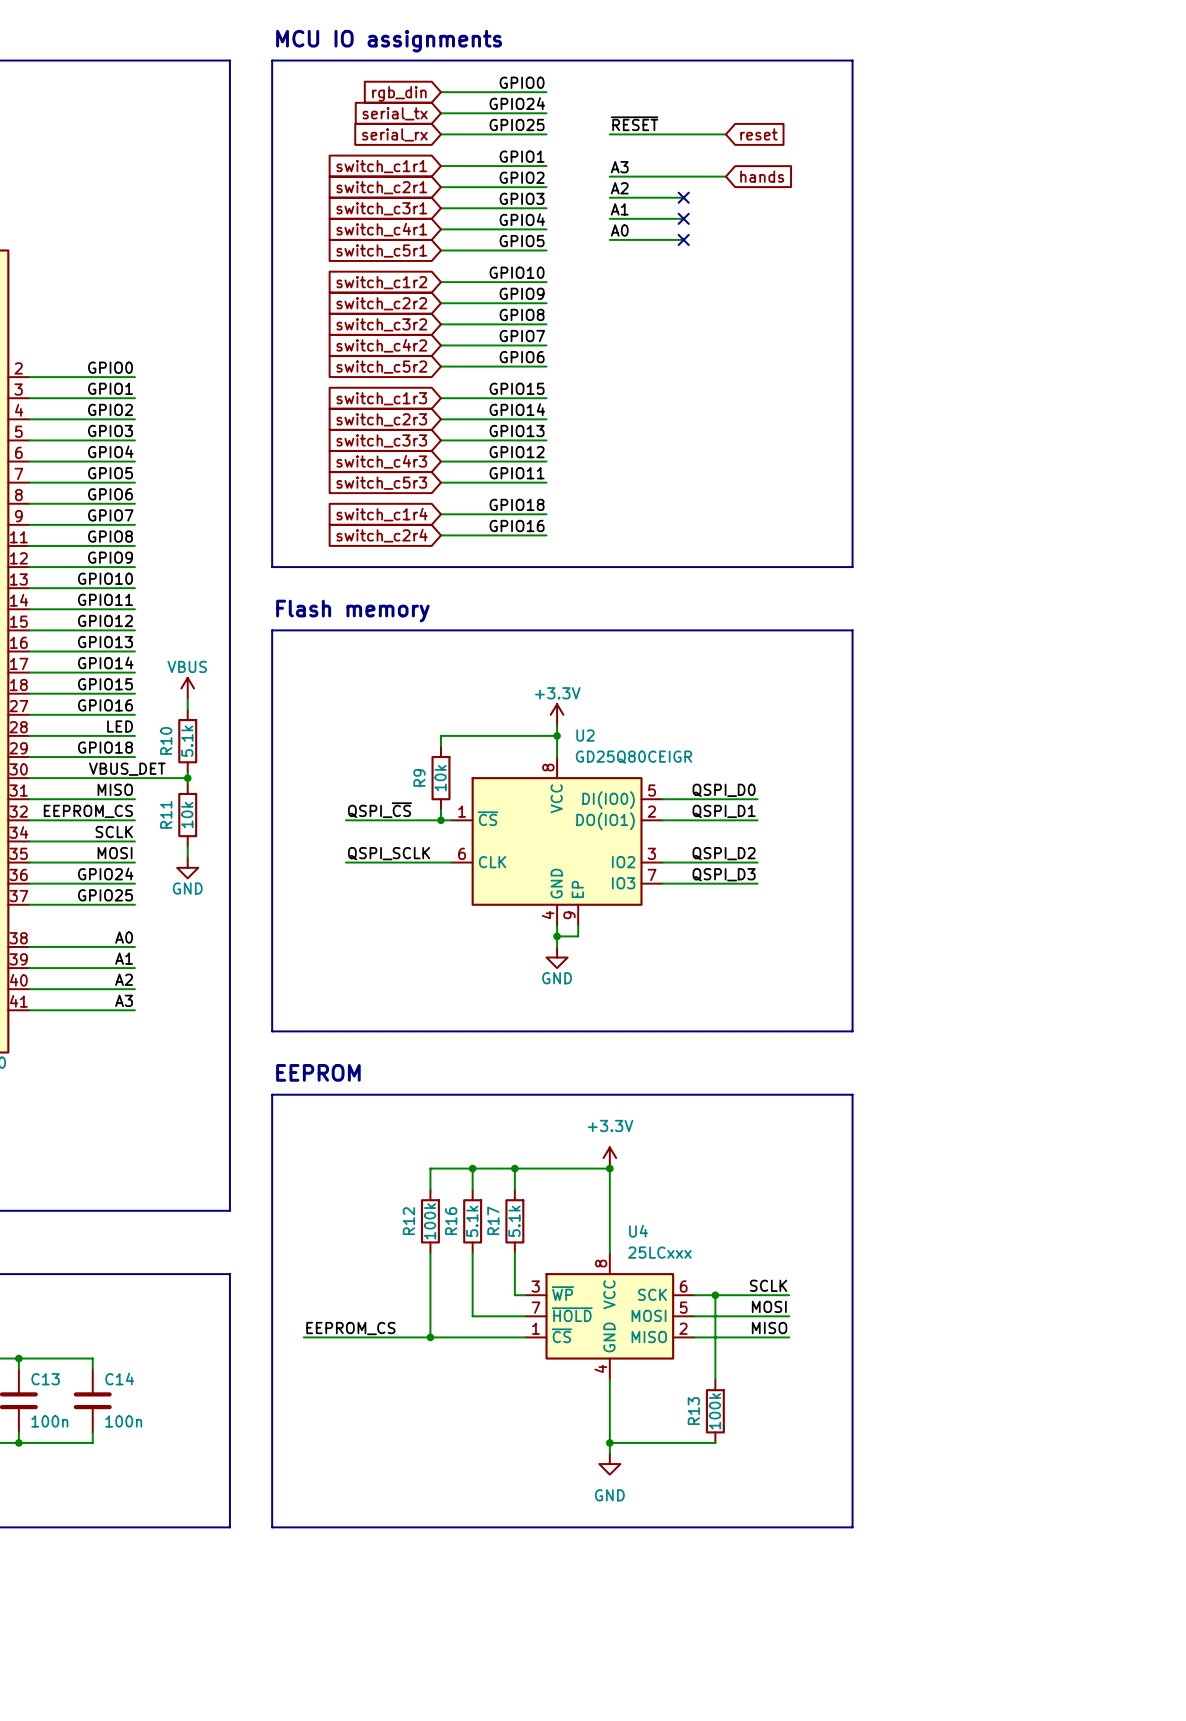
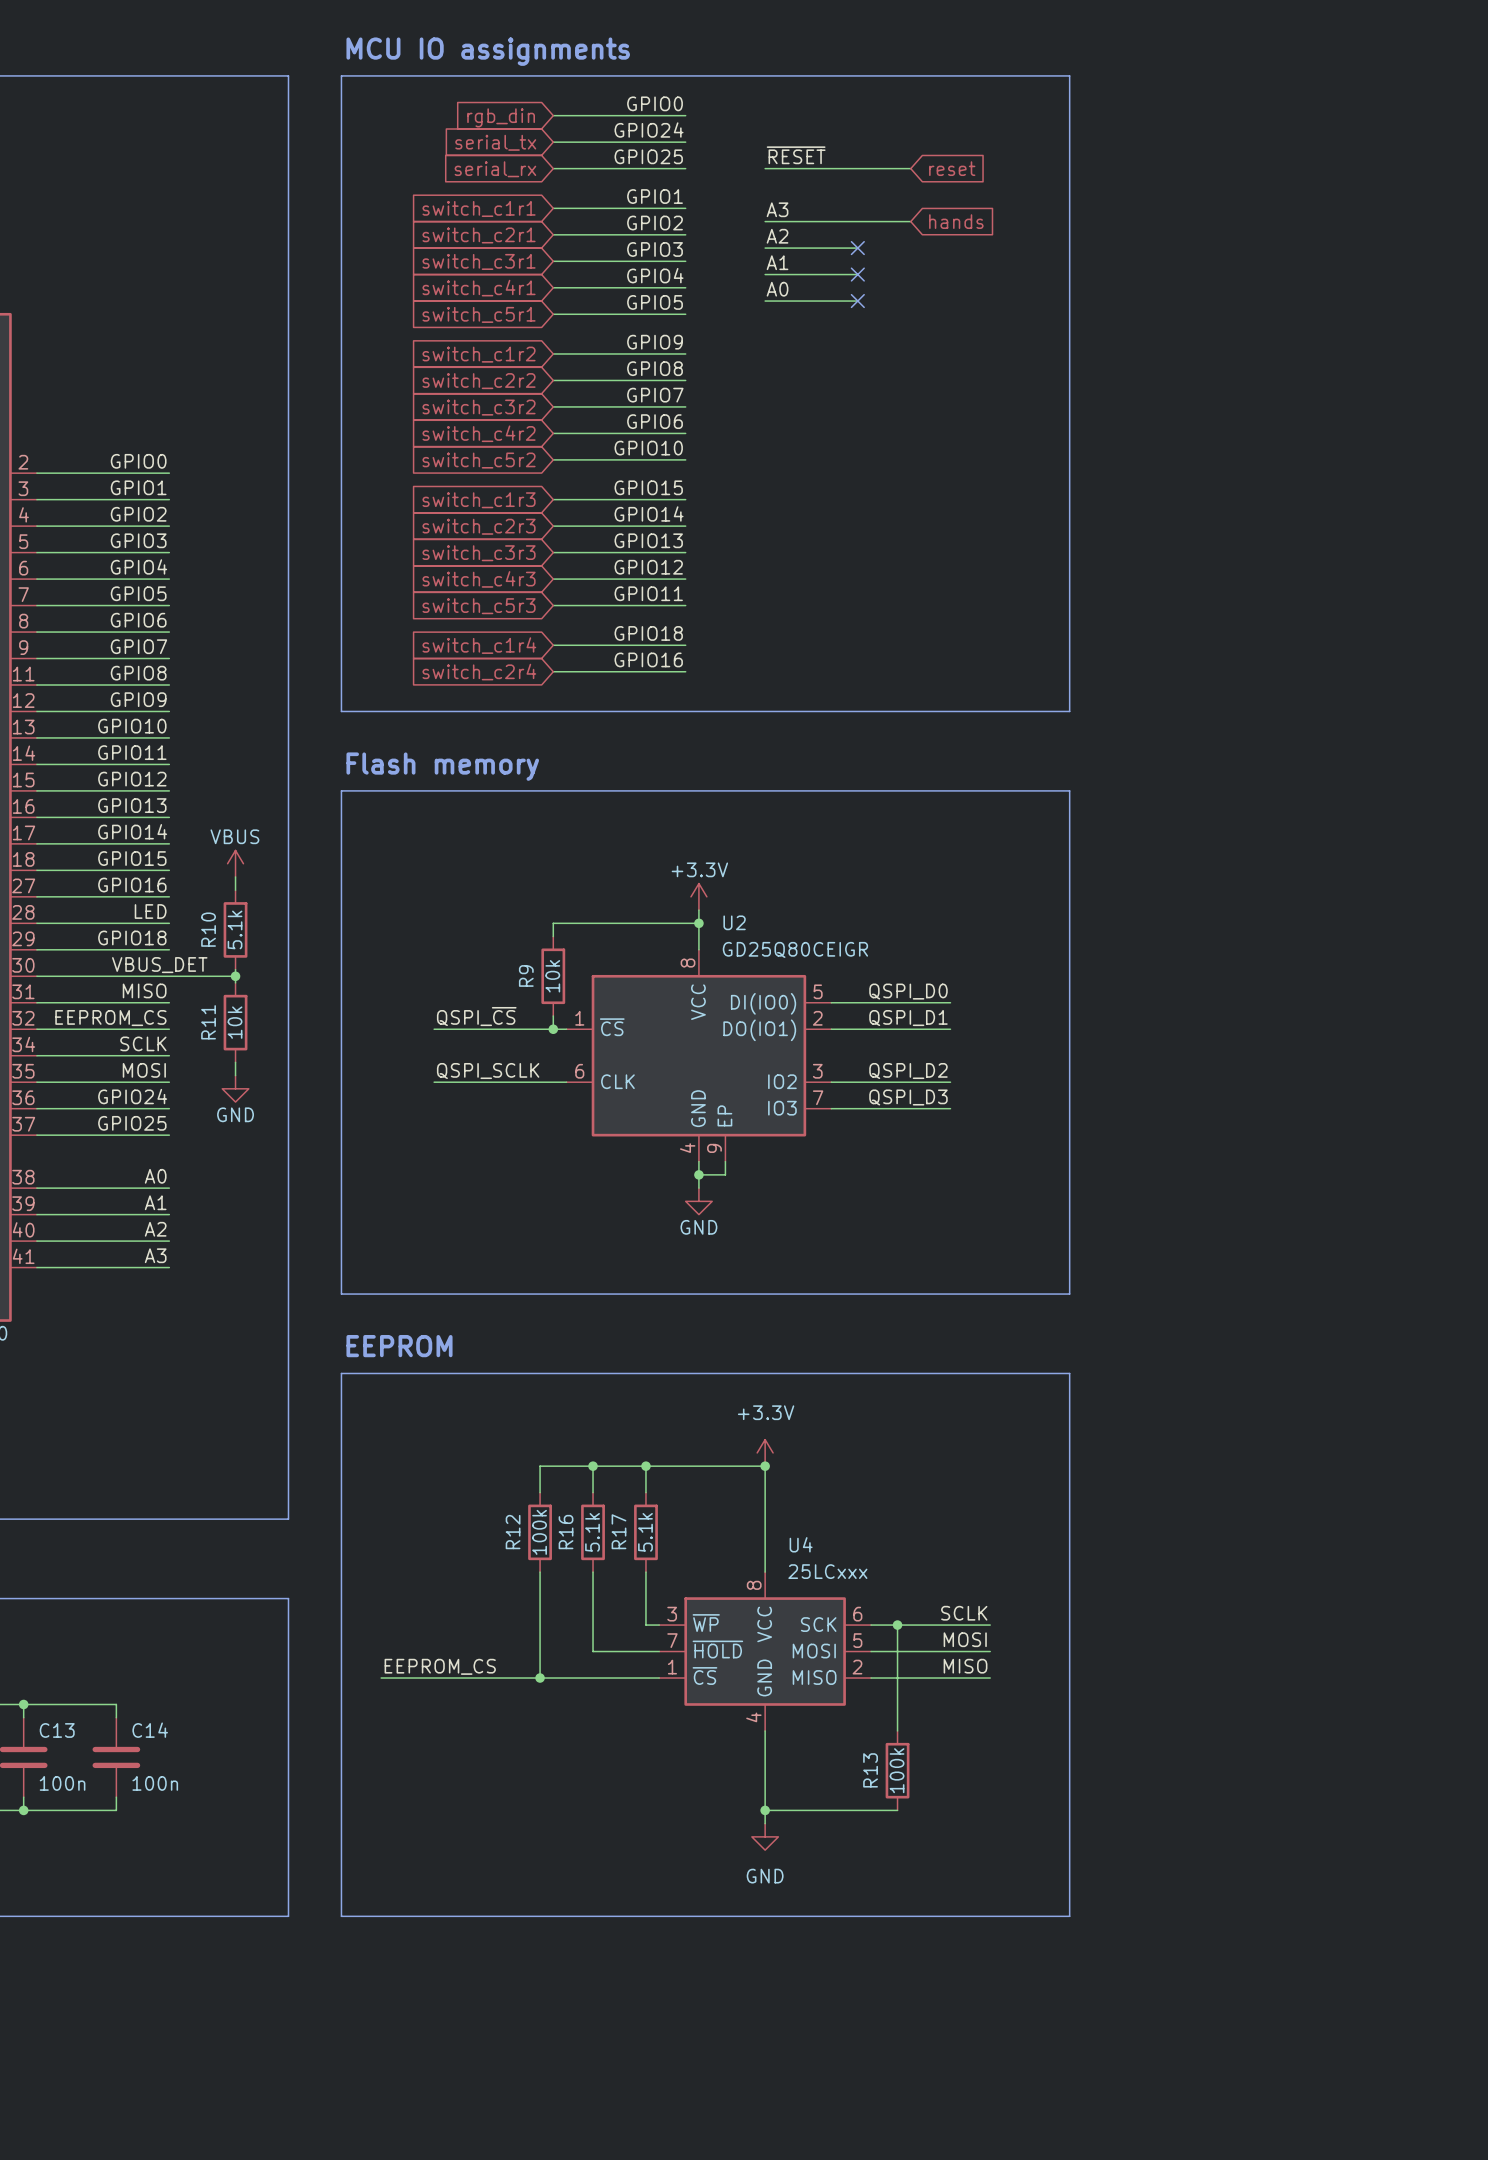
label: GPIO10 (517, 272) -> GPIO9 (655, 342)
label: GPIO9 (522, 293) -> GPIO8 (655, 368)
label: GPIO8 (522, 314) -> GPIO7 (655, 395)
label: GPIO7 (522, 336) -> GPIO6 (655, 421)
label: GPIO6 (522, 357) -> GPIO10 (648, 448)

